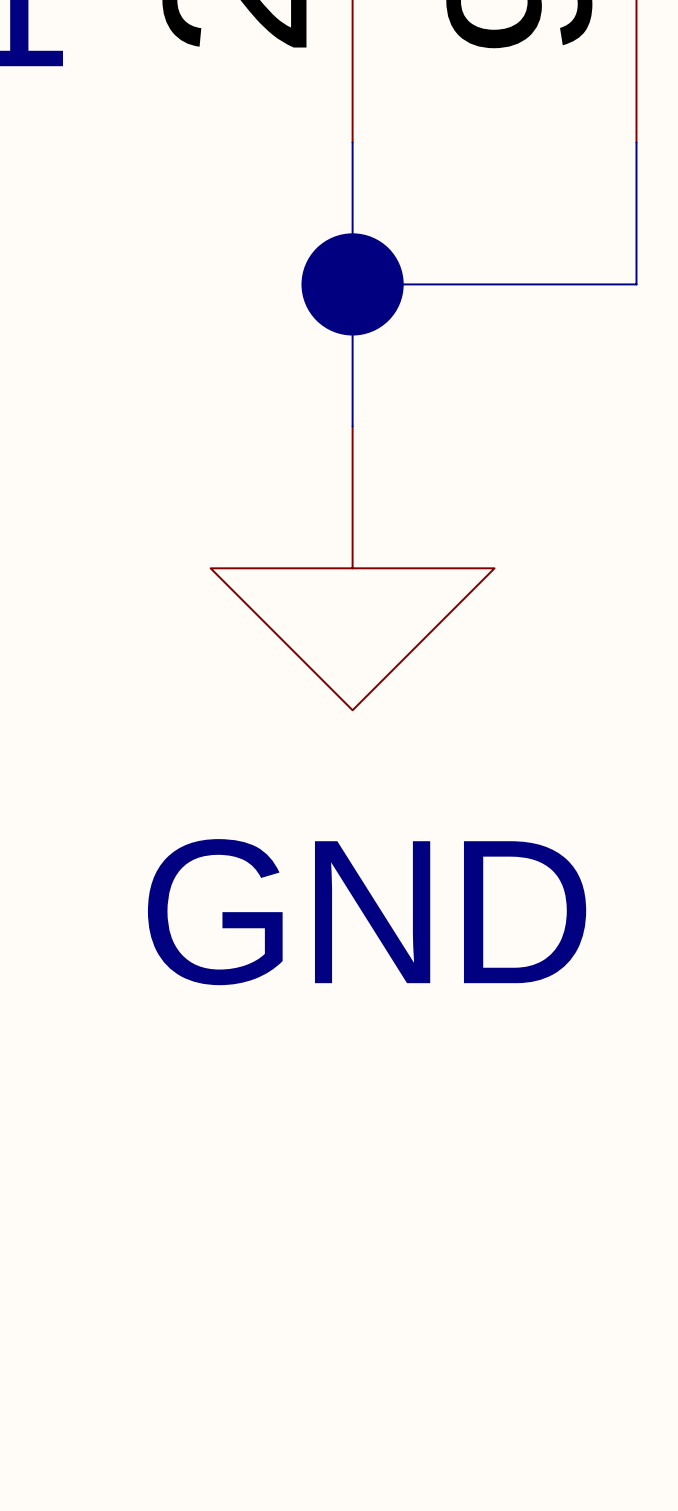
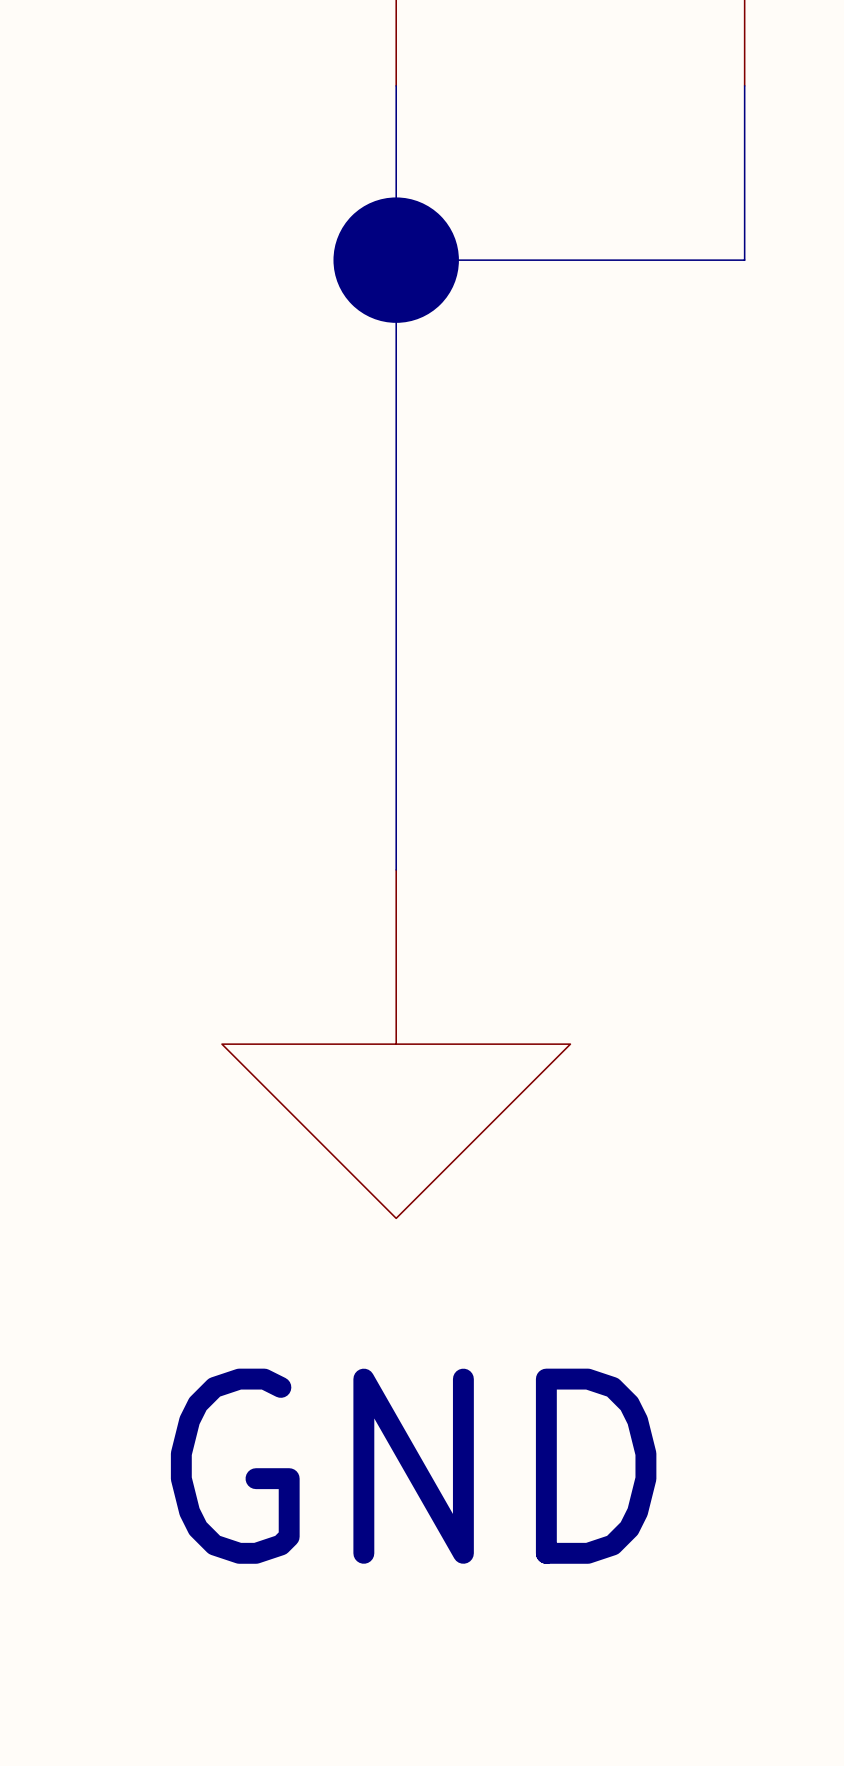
wire: none -> (396, 434) (396, 869)
power symbol position: GND (352, 568) -> GND (396, 1044)

